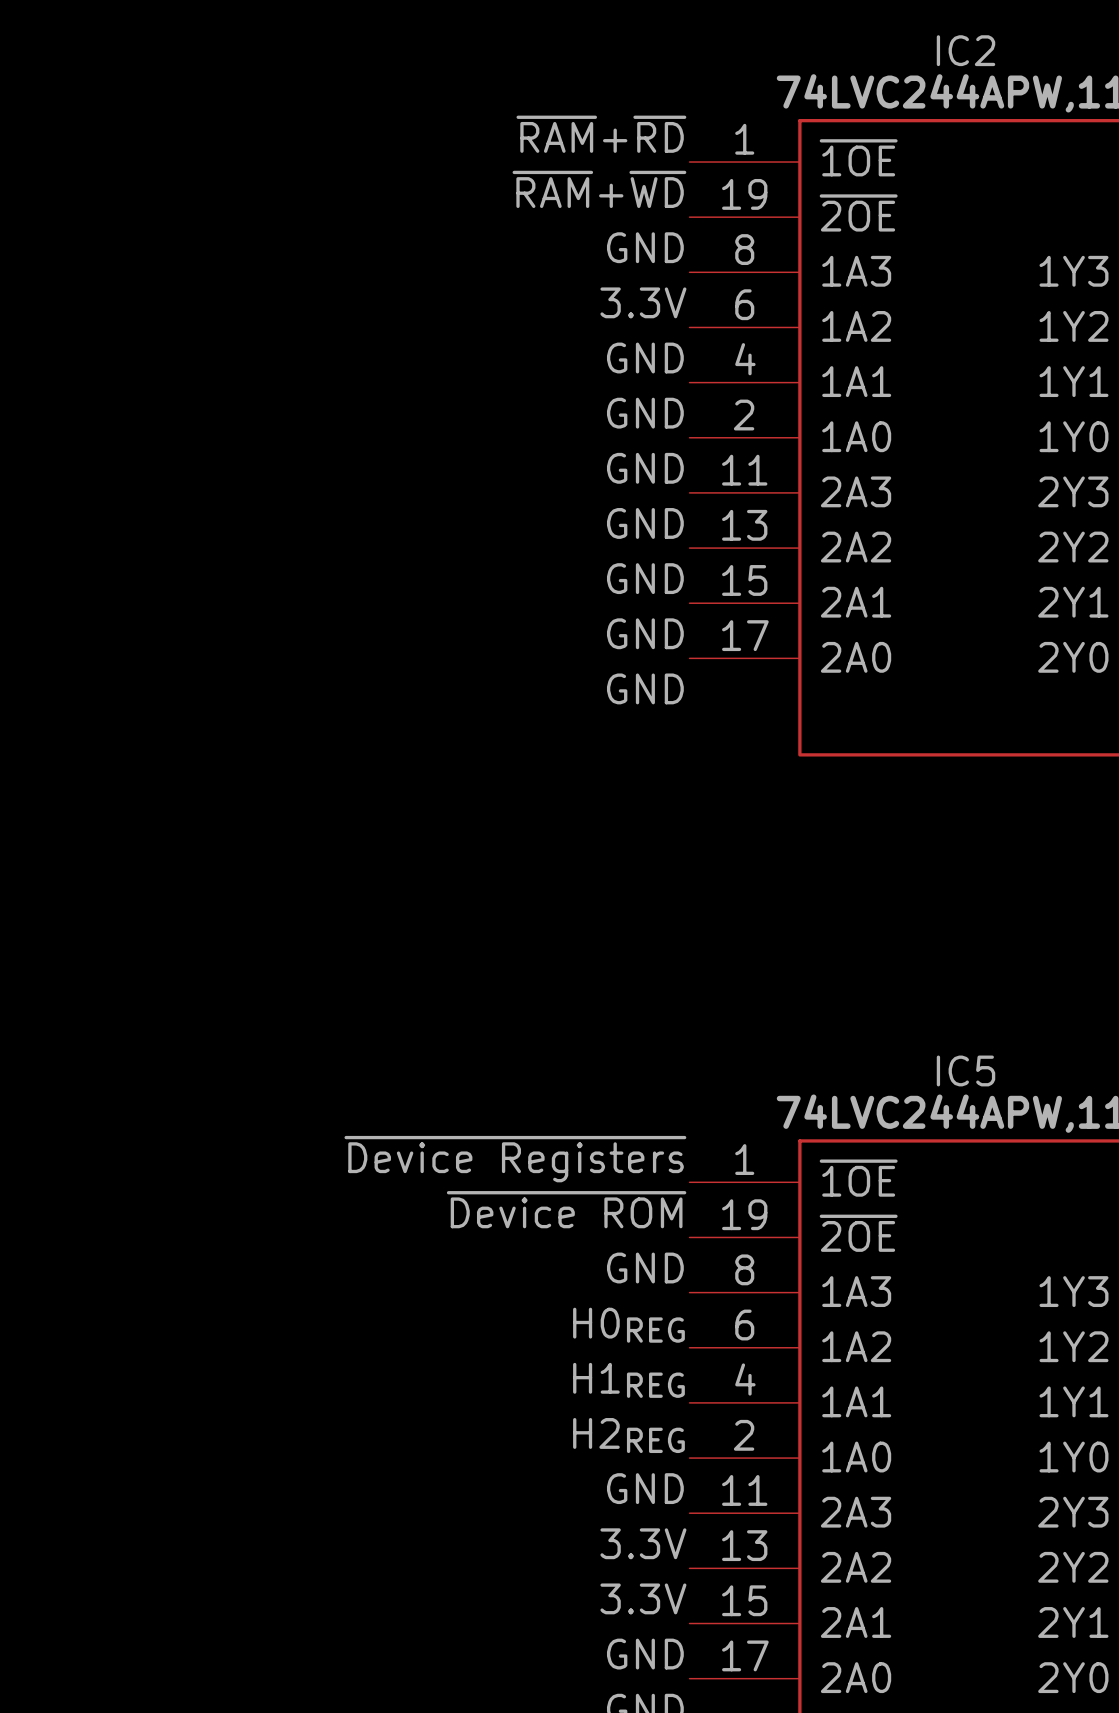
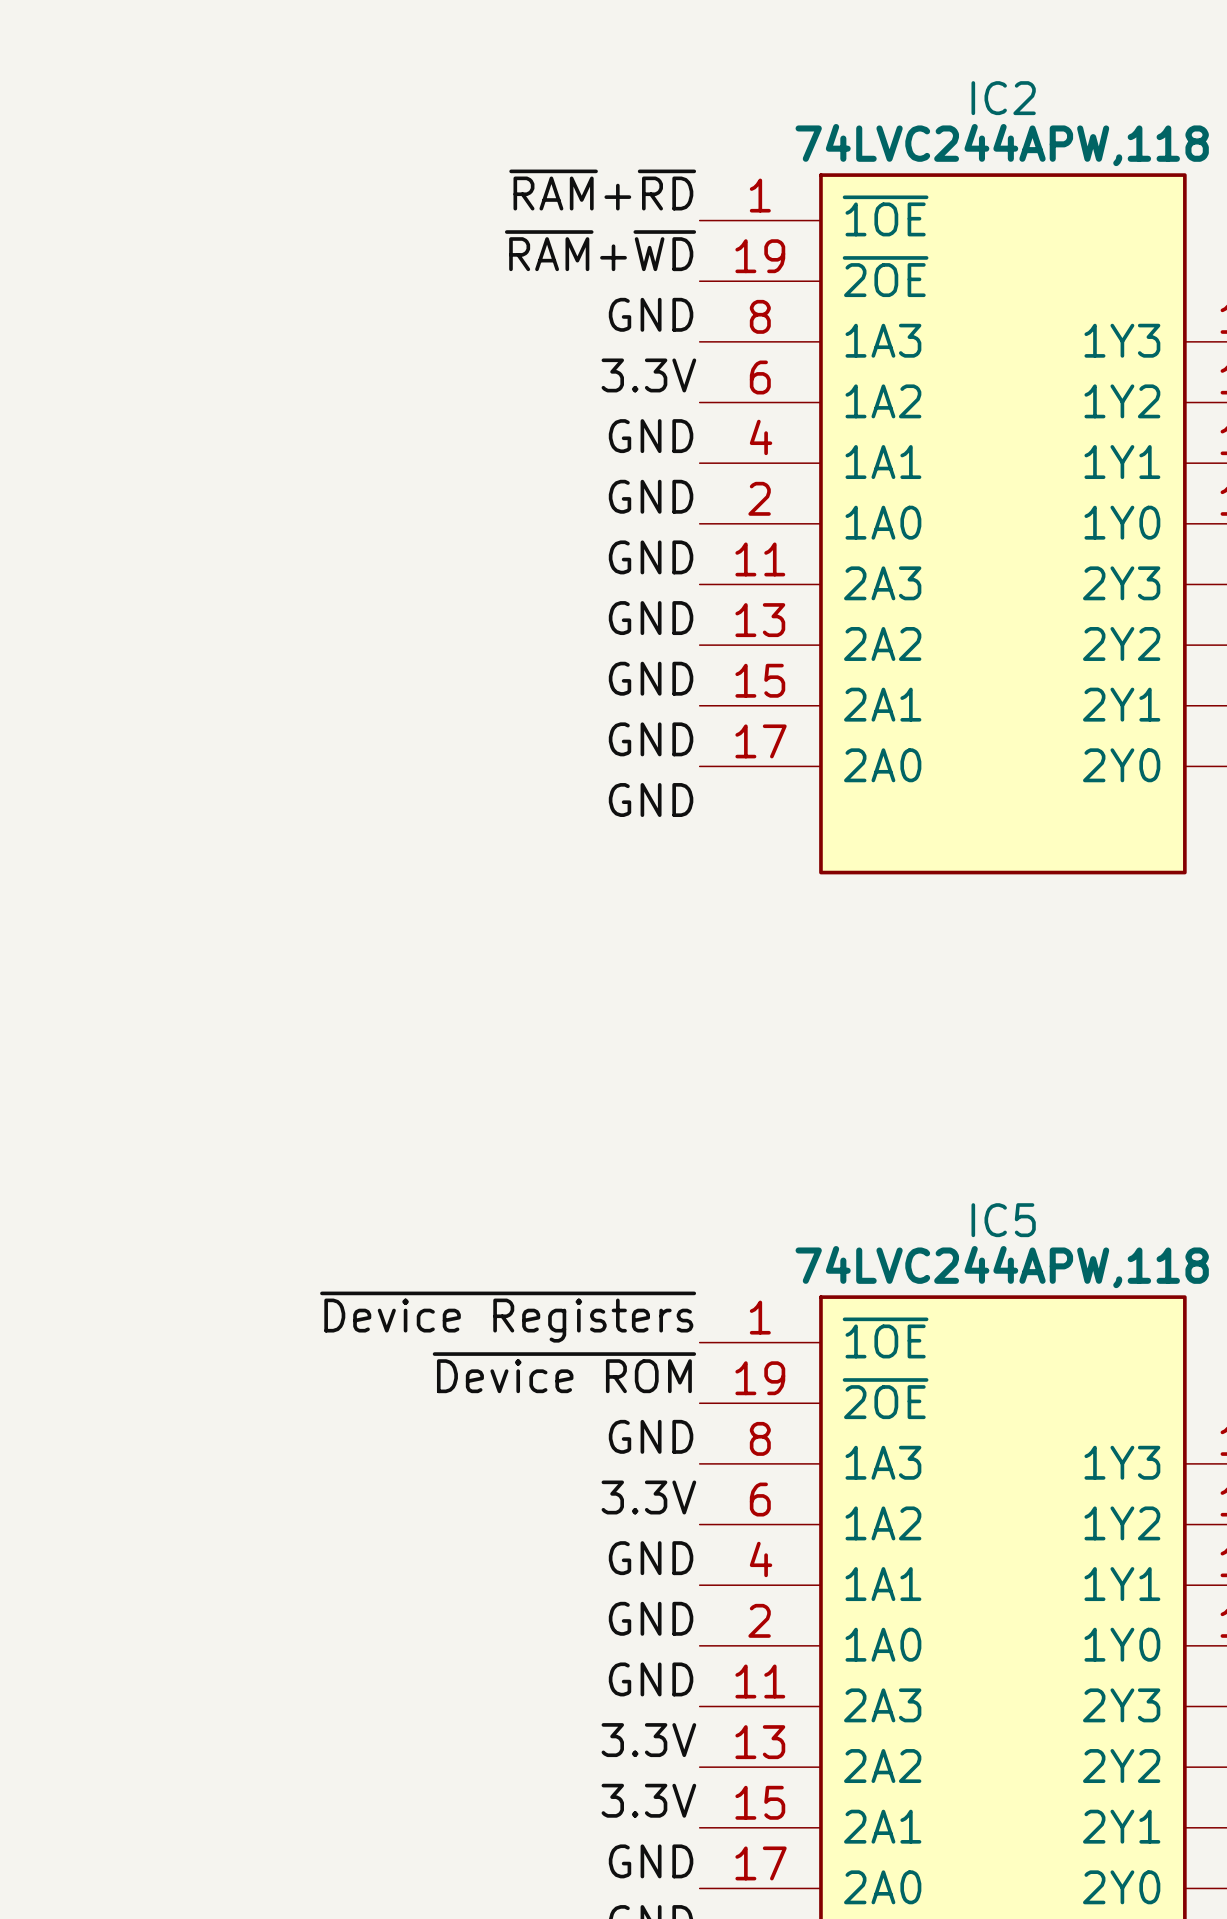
label: H0REG (628, 1325) -> 3.3V (648, 1497)
label: H1REG (628, 1380) -> GND (651, 1558)
label: H2REG (628, 1435) -> GND (651, 1618)

